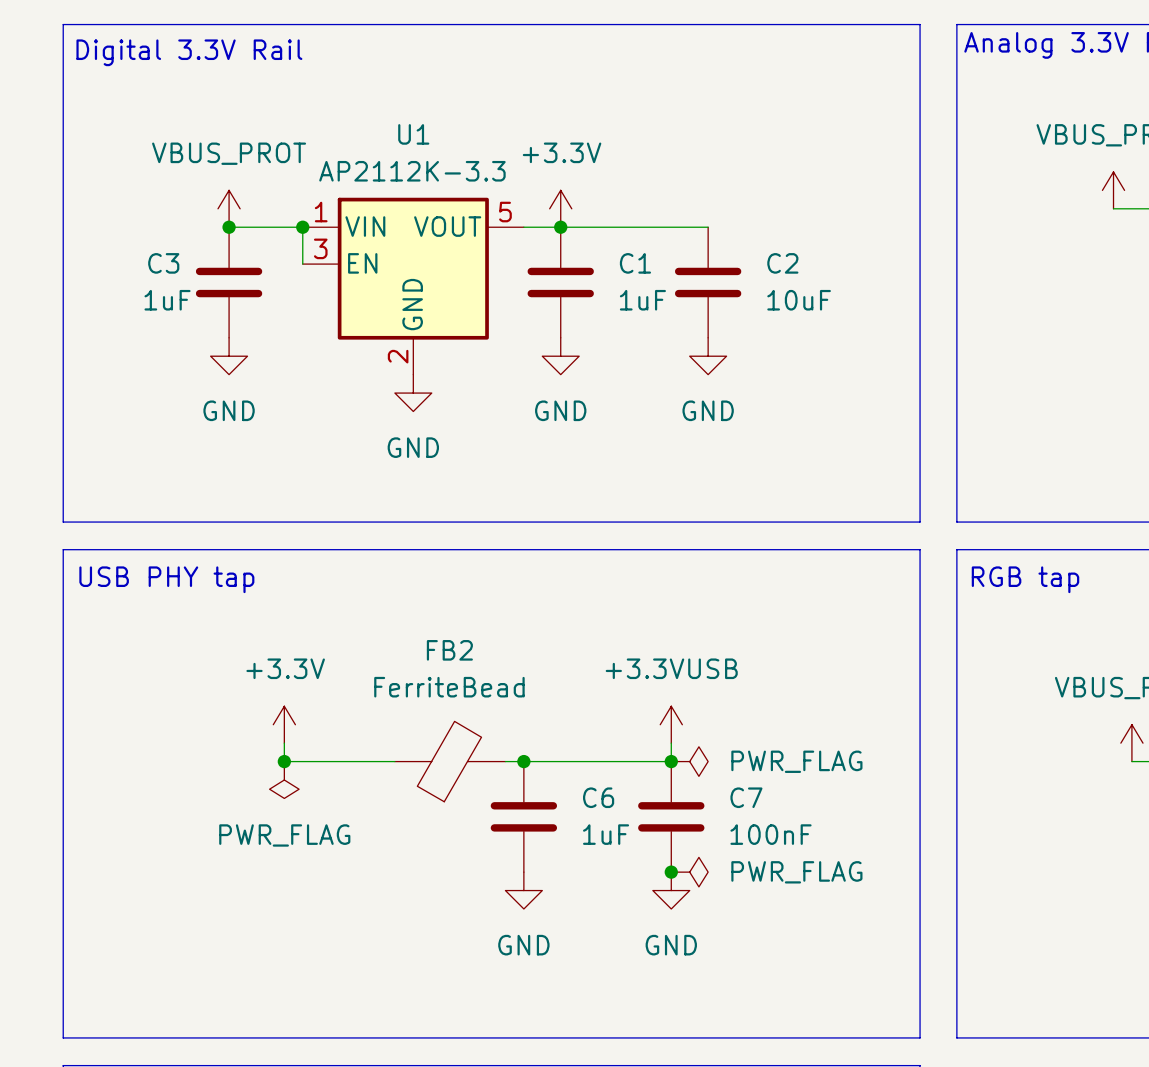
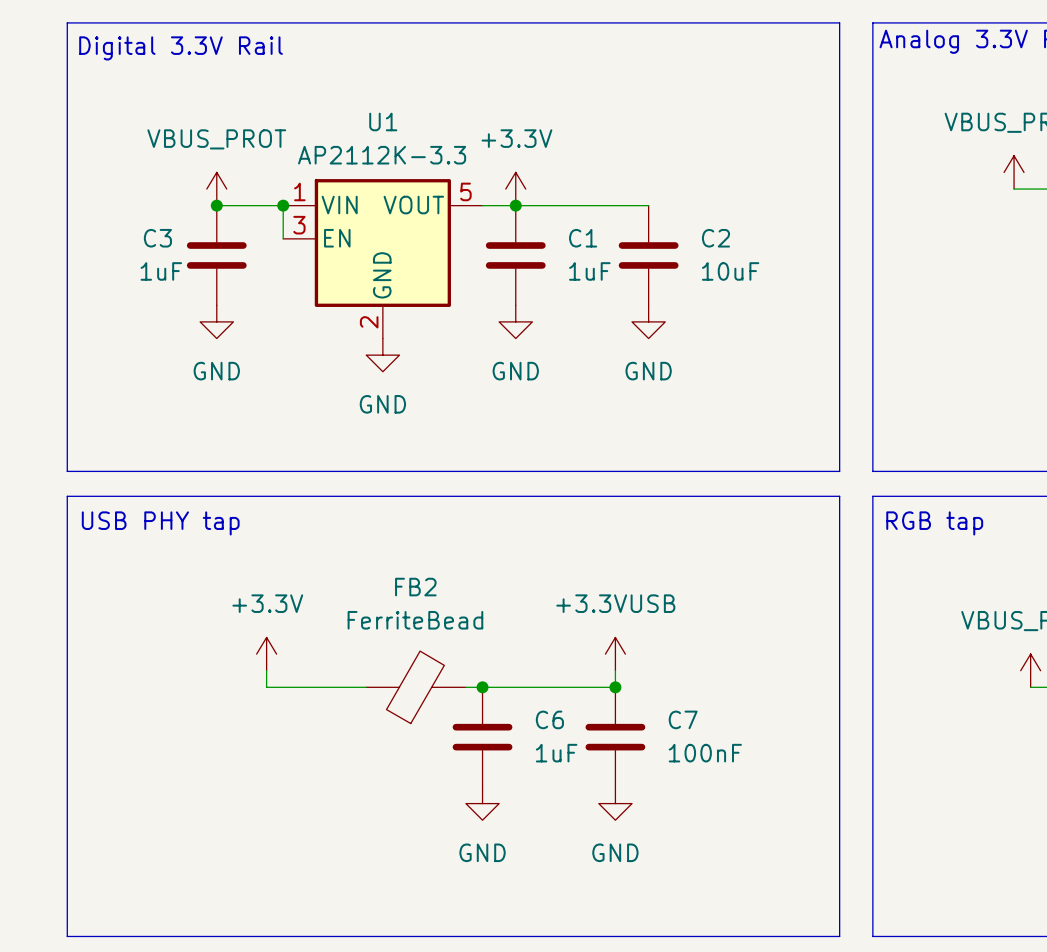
junction: (284, 761) -> none
power symbol: PWR_FLAG (689, 761) -> none
power symbol: PWR_FLAG (284, 780) -> none
junction: (671, 872) -> none
power symbol: PWR_FLAG (689, 872) -> none

